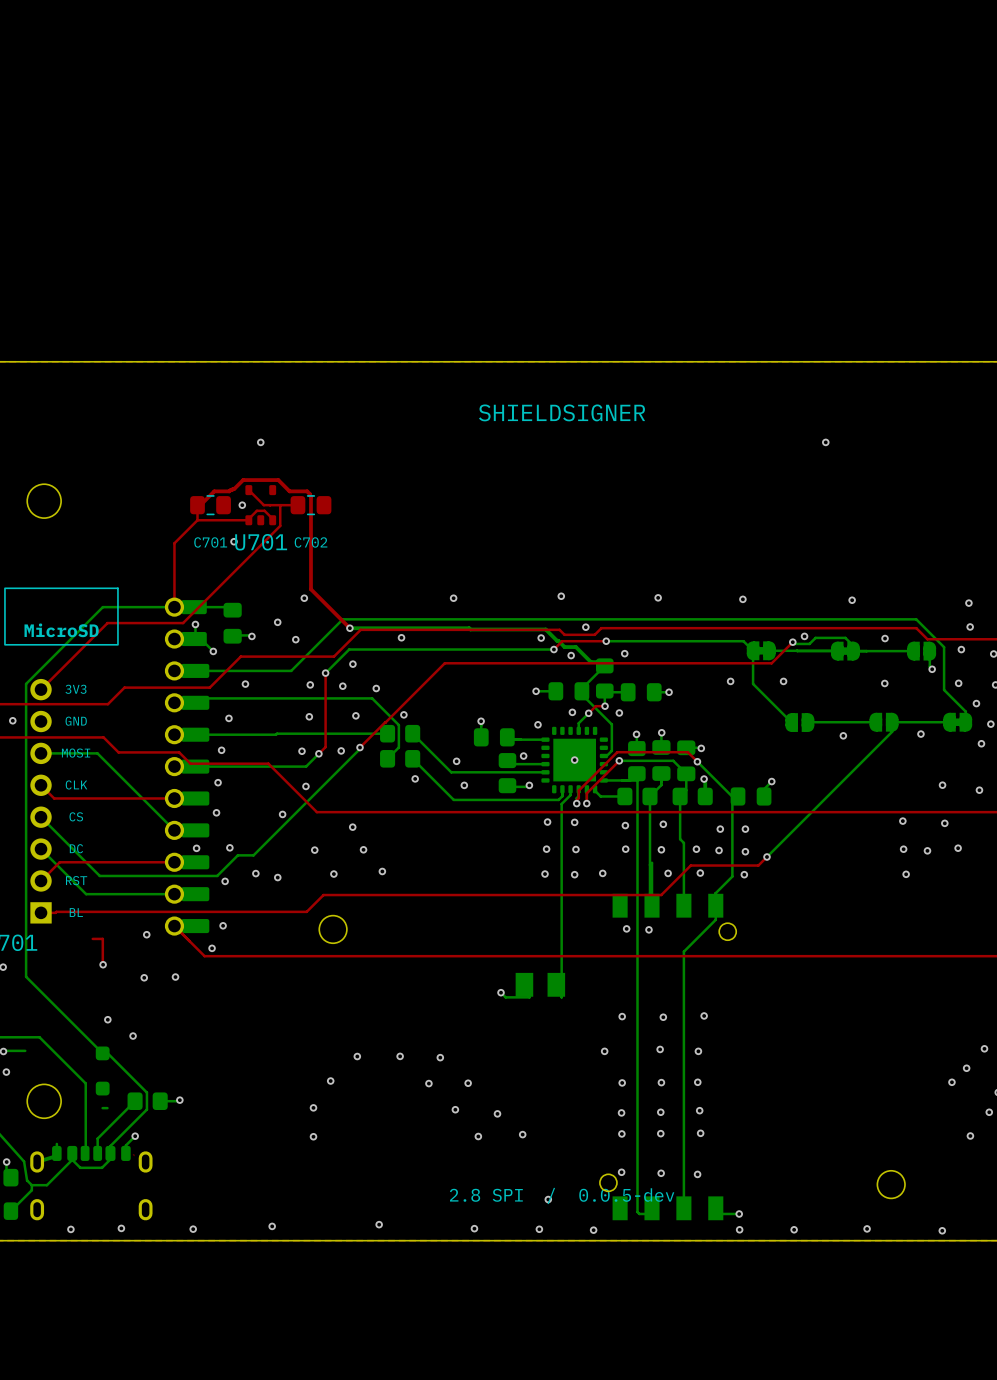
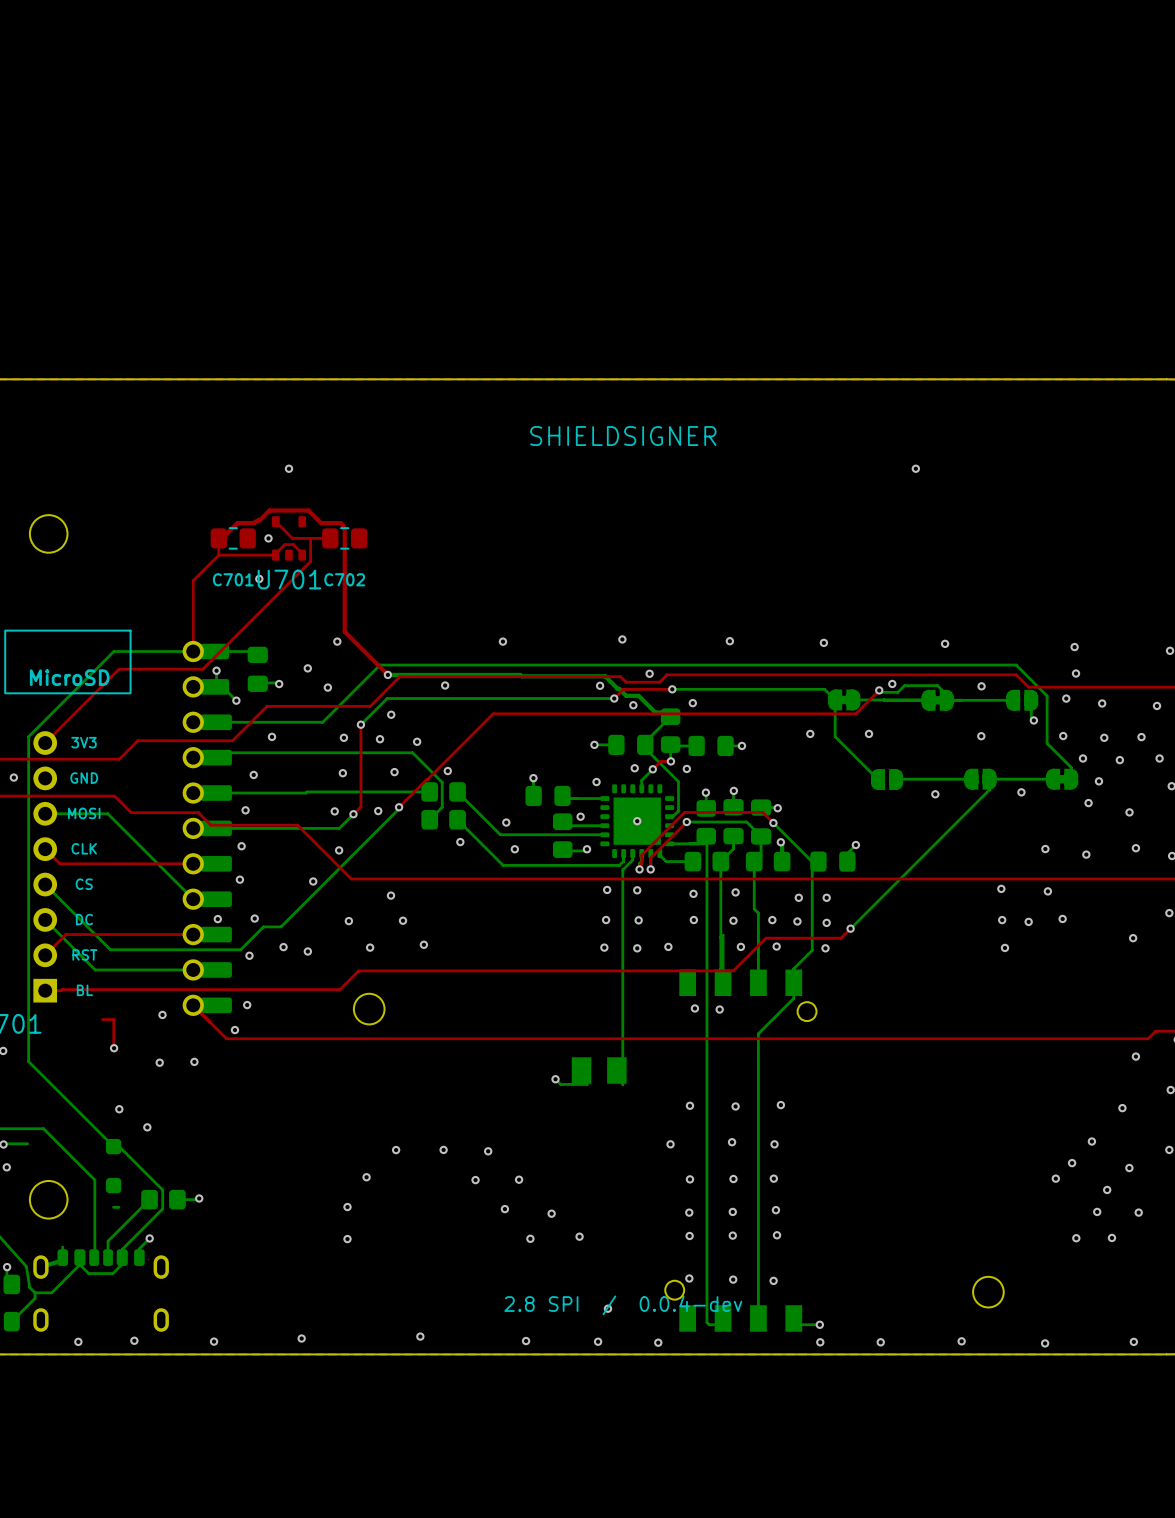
text: 2.8 SPI / 0.0.5-dev (562, 1195) -> 2.8 SPI / 0.0.4-dev (623, 1305)

